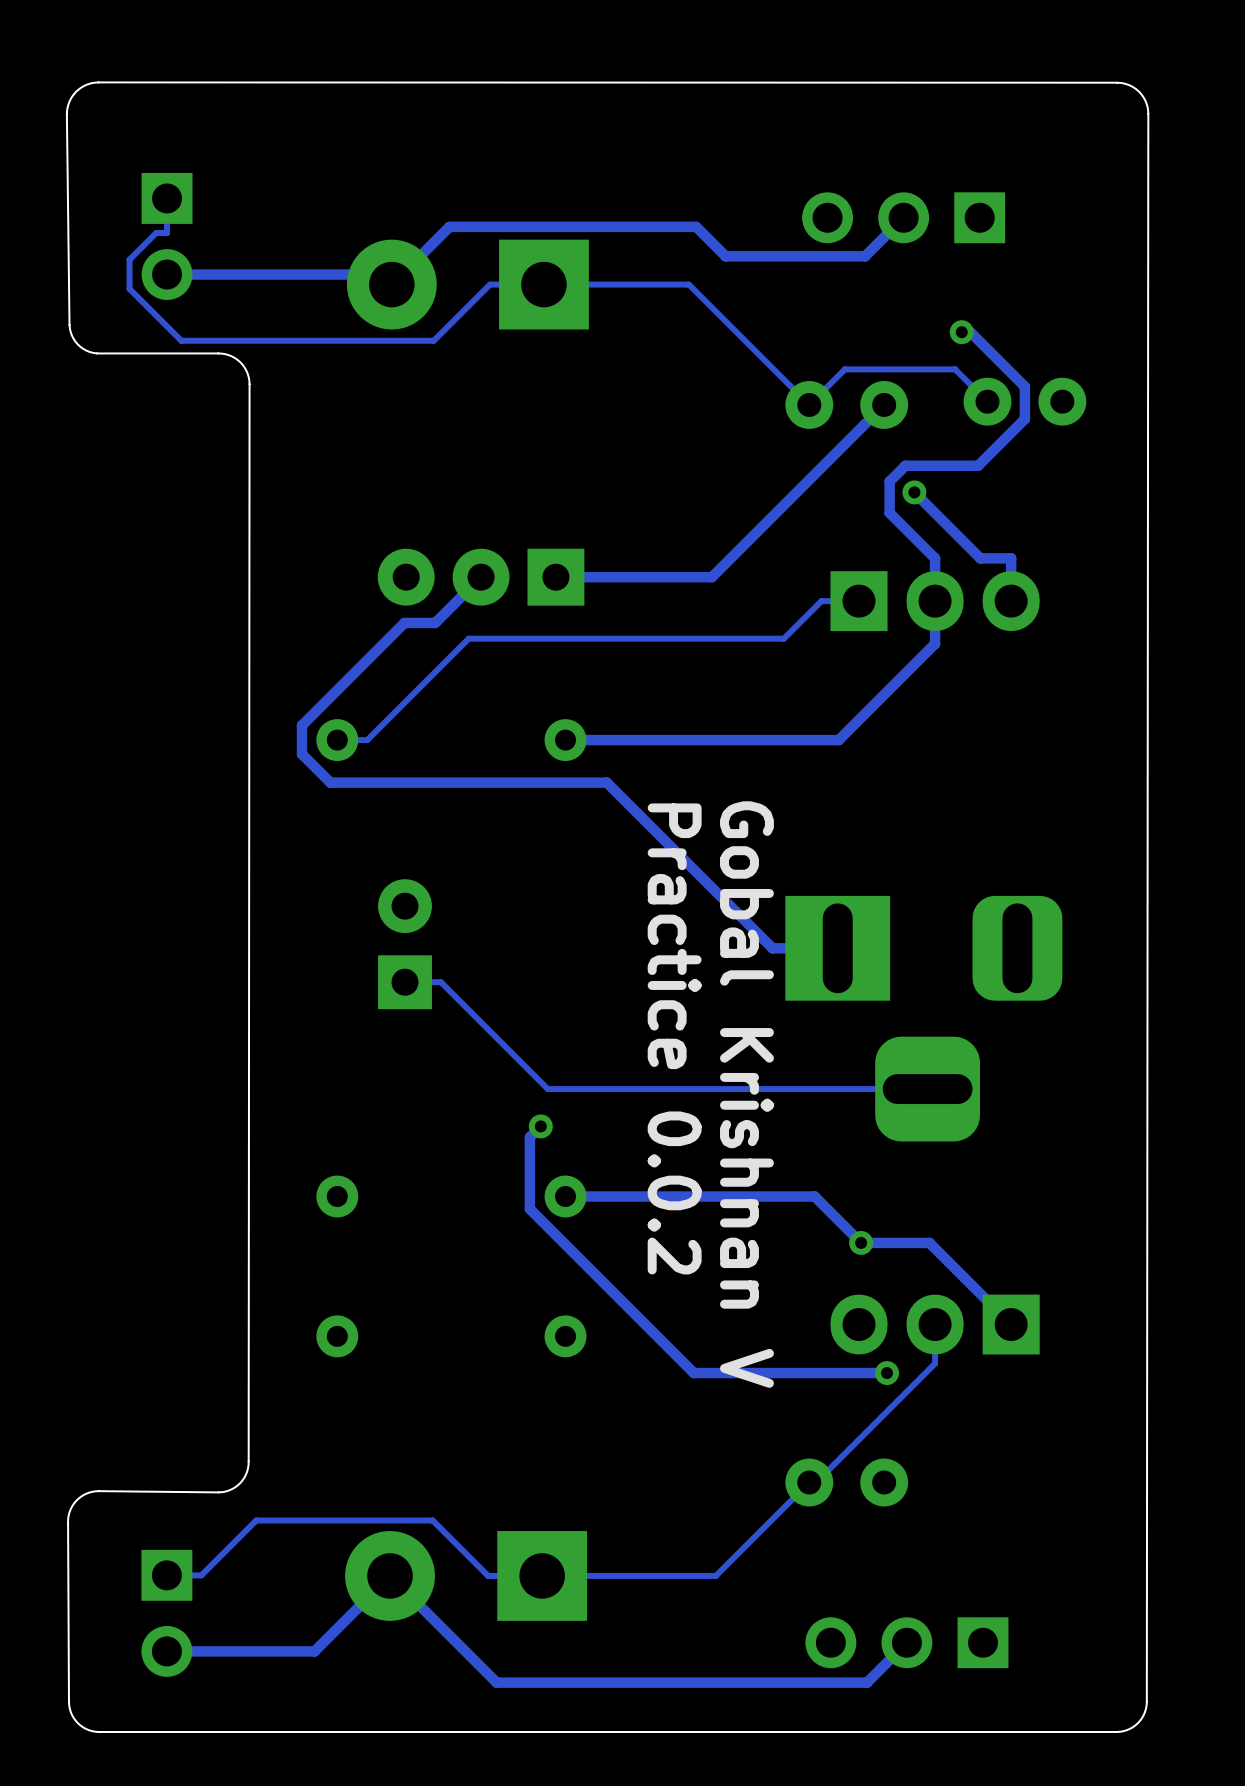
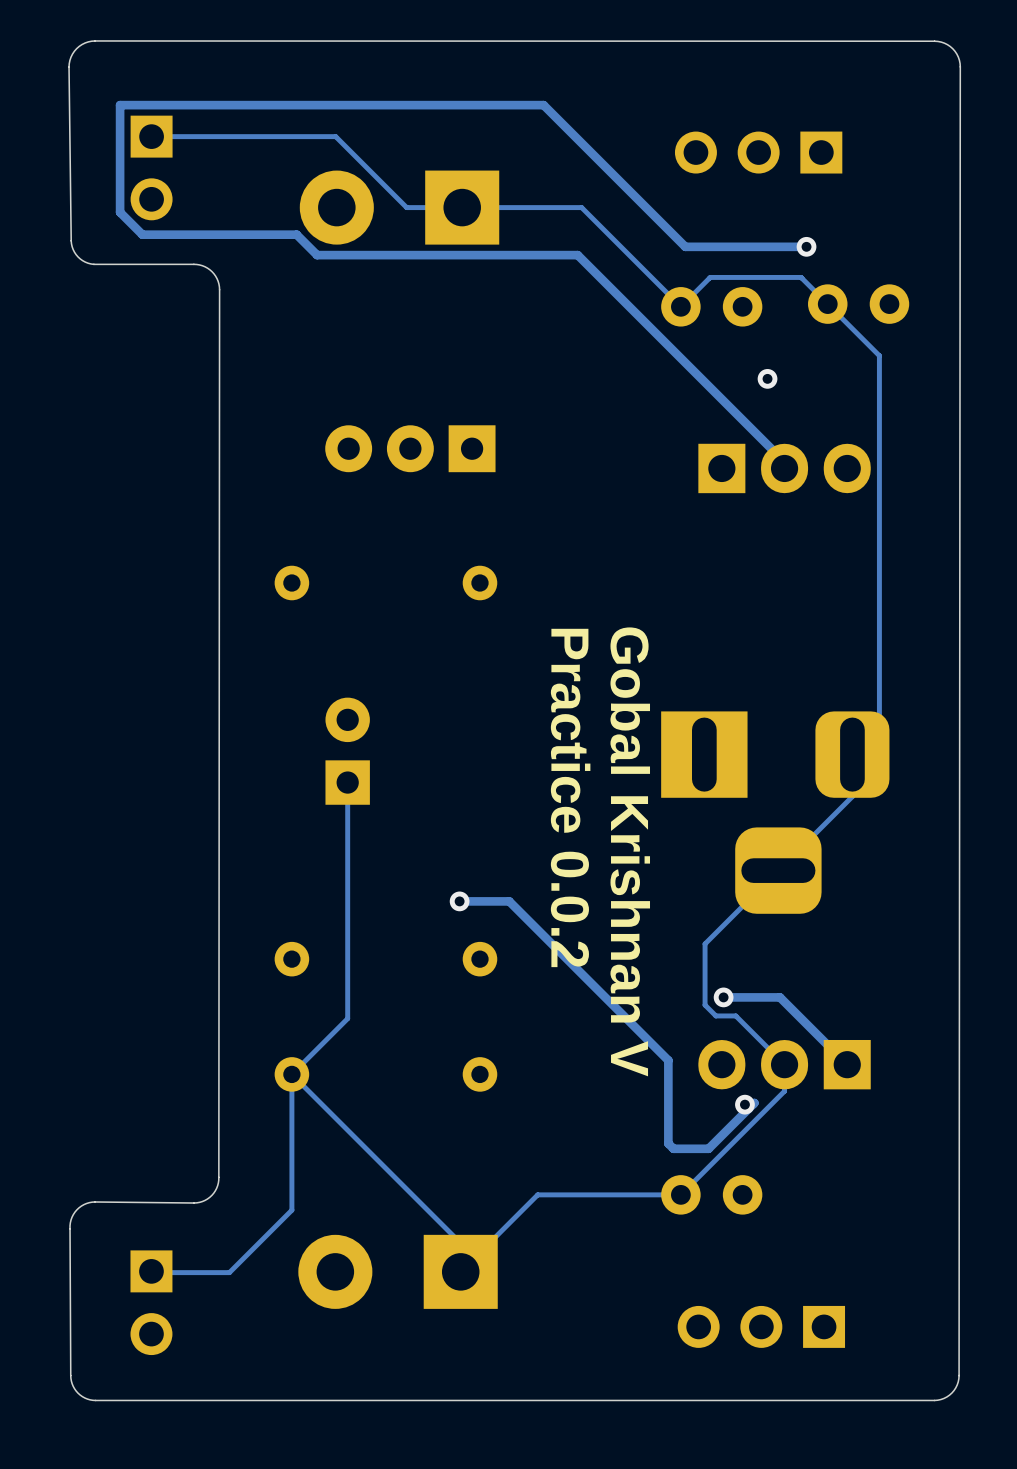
track: (167, 198) (167, 232) (156, 232) (129, 259) (129, 288) (181, 340) (433, 340) (490, 284) -> (151, 136) (335, 136) (406, 207) (417, 207)
track: (903, 217) (865, 256) (725, 256) (696, 226) (449, 226) (391, 284) (381, 274) (167, 274) -> none
track: (961, 332) (970, 332) (1024, 386) (1024, 419) (978, 465) (905, 465) (889, 481) (889, 512) (935, 558) (935, 593) -> (806, 246) (685, 246) (543, 105) (120, 105) (120, 212) (142, 234) (296, 234) (317, 255) (577, 255) (784, 461)
track: none -> (827, 304) (879, 355) (879, 727) (852, 754) (852, 796) (705, 943) (705, 1005) (715, 1015) (735, 1015) (784, 1064)
track: (884, 404) (711, 577) (555, 577) -> none
track: (914, 492) (980, 558) (1011, 558) (1011, 601) -> none
track: (481, 577) (435, 622) (404, 622) (302, 725) (302, 754) (330, 782) (606, 782) (772, 948) (837, 948) -> none
track: (859, 601) (821, 601) (783, 638) (468, 638) (367, 740) (337, 740) -> none
track: (935, 601) (935, 643) (838, 740) (565, 740) -> none
track: (405, 982) (440, 982) (547, 1089) (927, 1089) -> (347, 782) (347, 1018) (291, 1074)
track: (540, 1126) (529, 1137) (529, 1209) (693, 1373) (887, 1373) -> (459, 901) (509, 901) (668, 1060) (668, 1143) (673, 1148) (708, 1148) (754, 1103)
track: (565, 1196) (814, 1196) (861, 1242) -> none
track: none -> (291, 1074) (291, 1210) (229, 1272) (153, 1271)
track: (935, 1356) (935, 1363) (816, 1482) (809, 1482) (715, 1575) (488, 1575) (432, 1520) (256, 1520) (201, 1575) (169, 1575) -> (784, 1091) (680, 1194) (537, 1194) (460, 1271) (460, 1243) (291, 1074)
track: (906, 1642) (867, 1682) (496, 1682) (390, 1575) (314, 1651) (166, 1651) -> none

